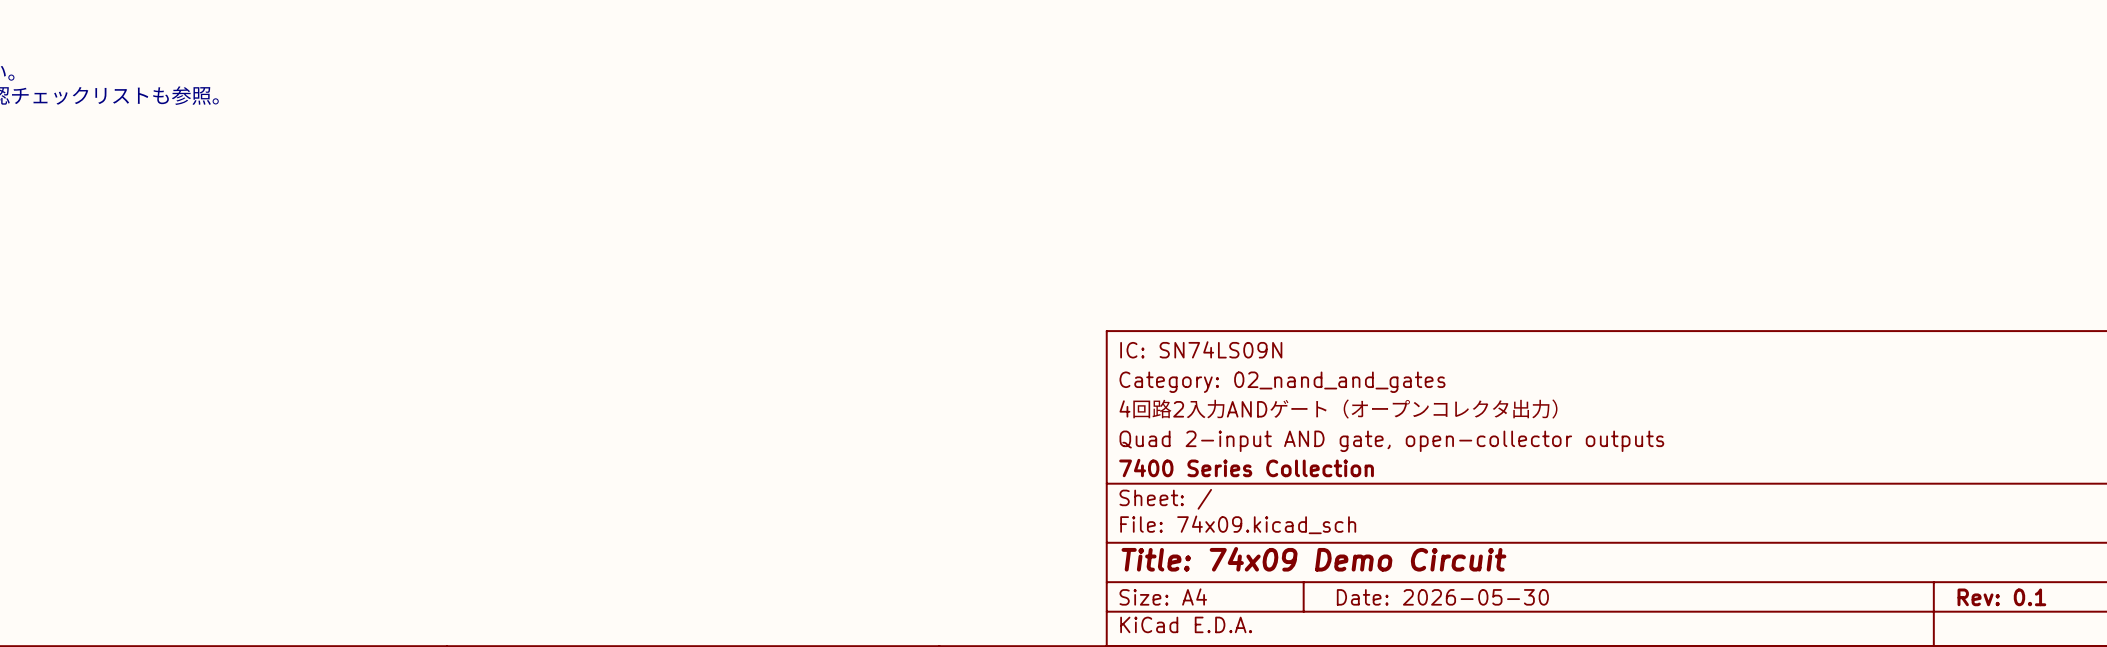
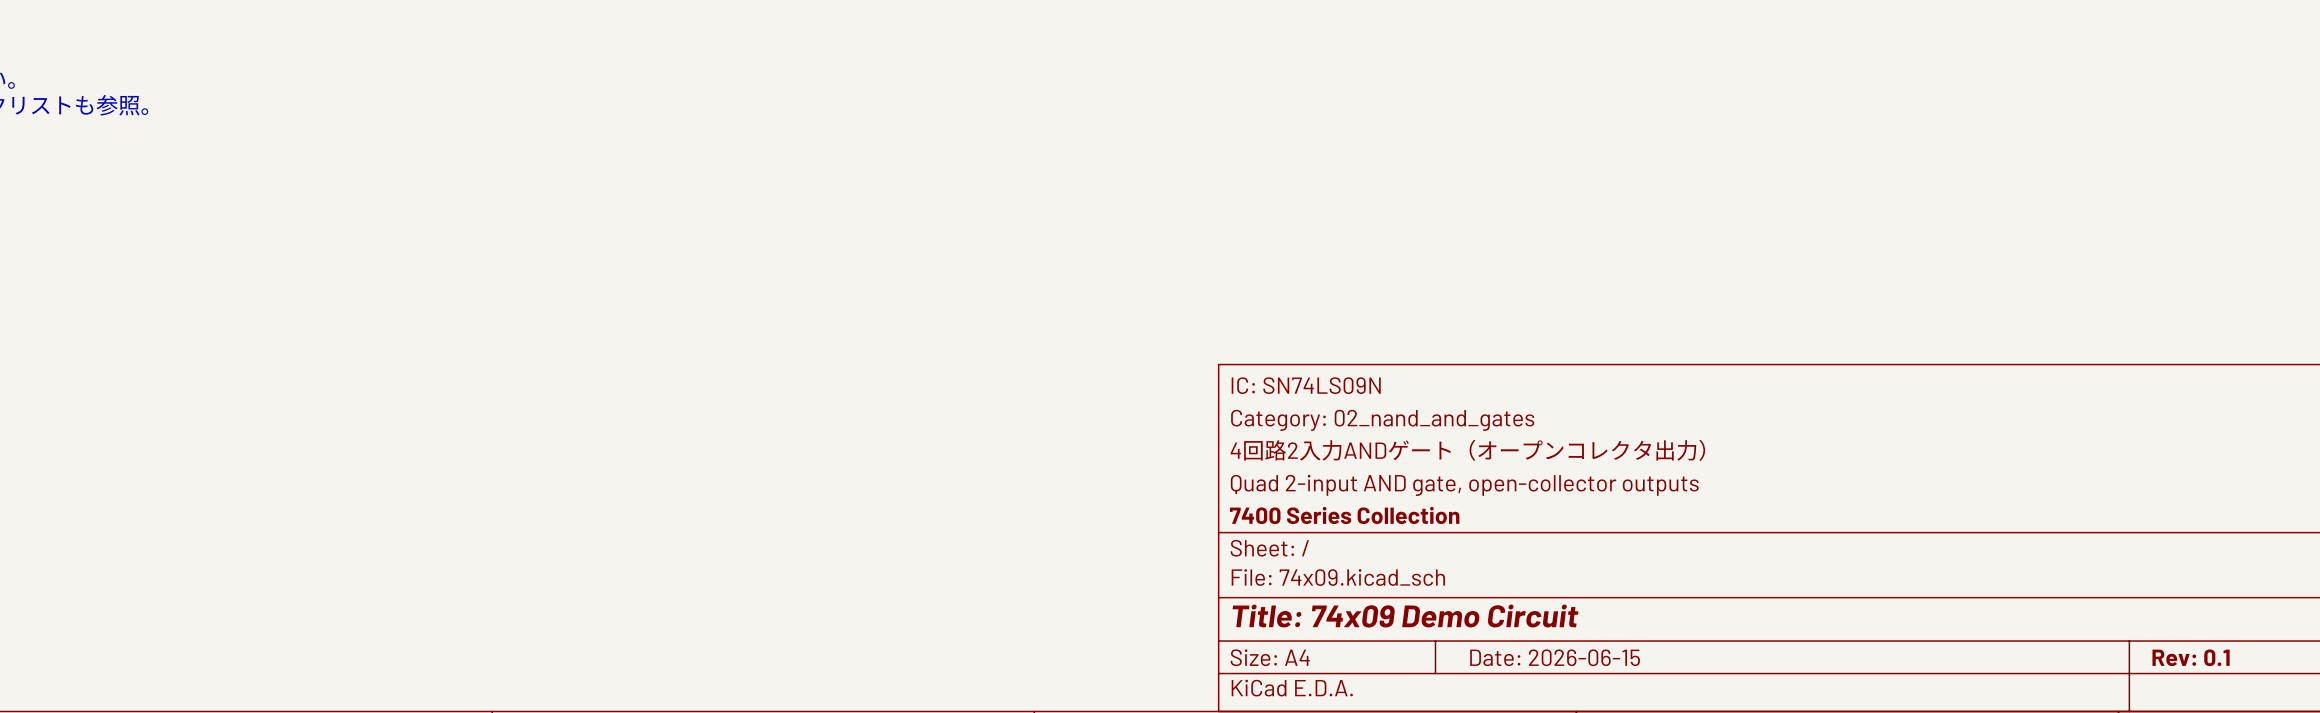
title block: Date: 2026-05-30 (1442, 597) -> Date: 2026-06-15 (1555, 657)

